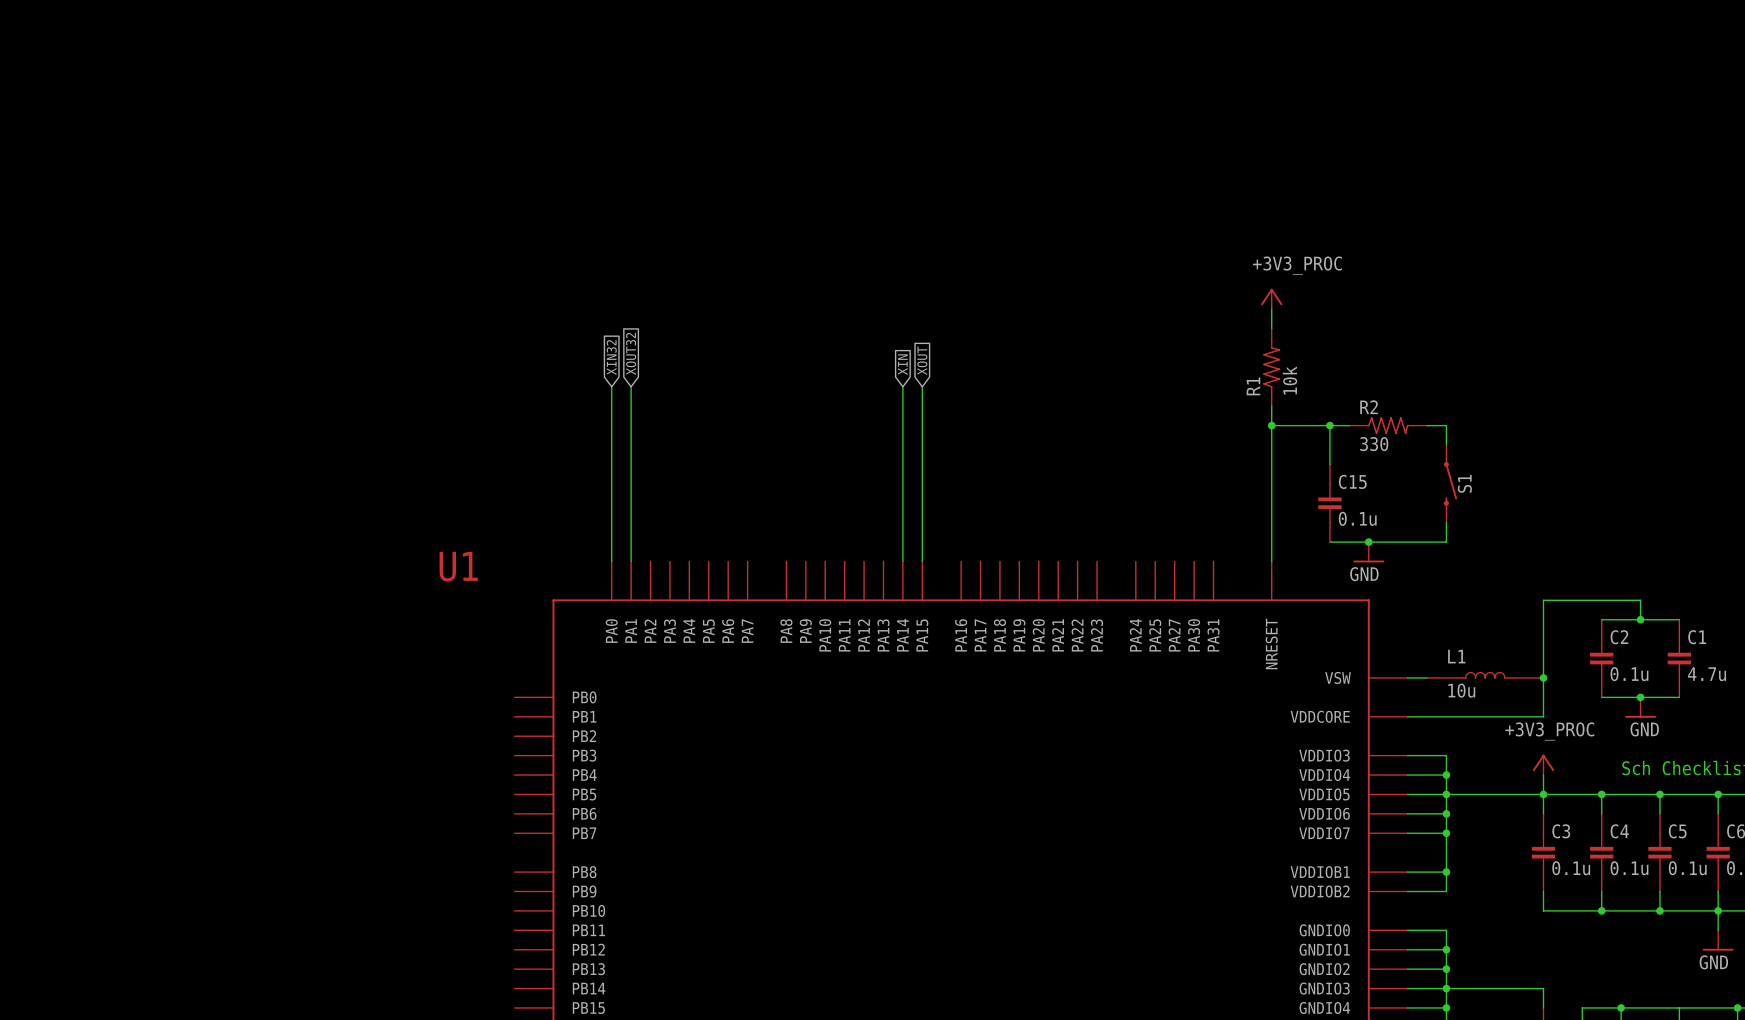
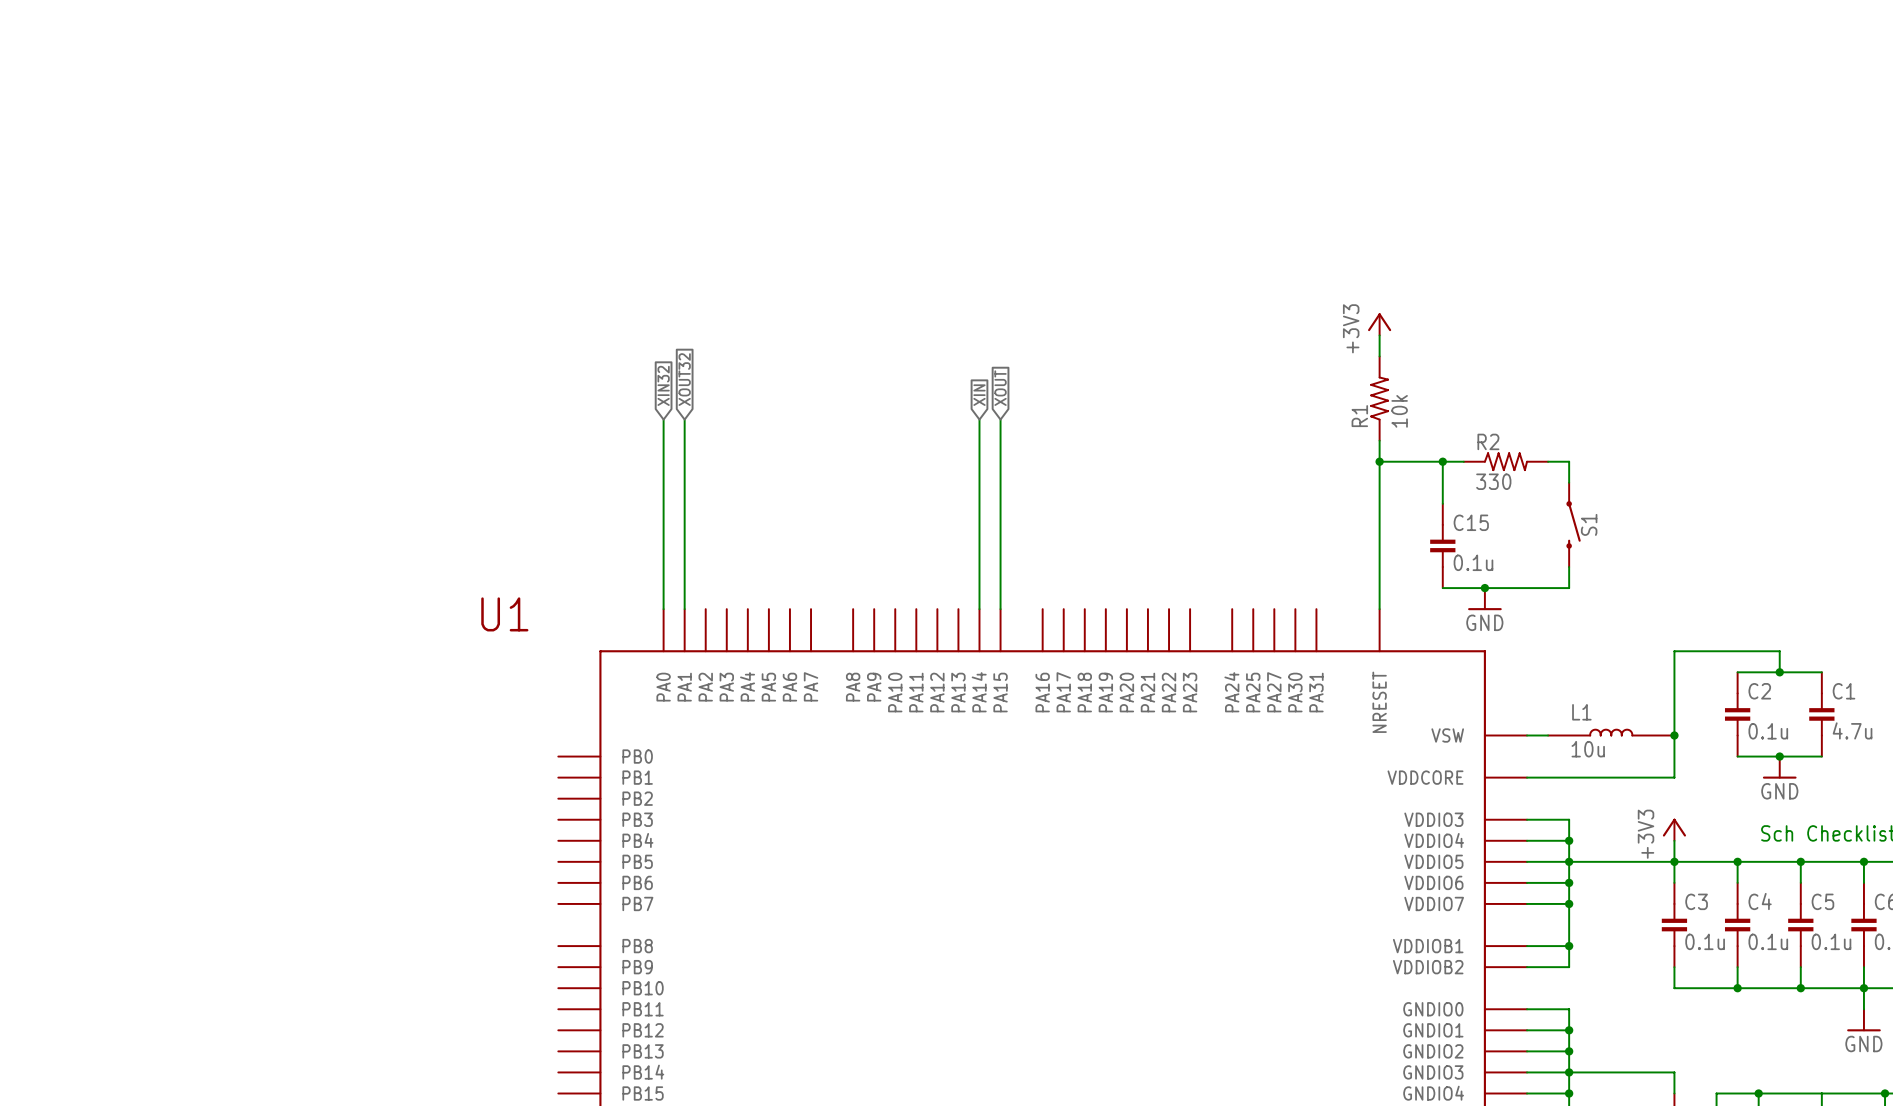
label: +3V3_PROC (1297, 265) -> none
power symbol text: none -> +3V3 (1351, 328)
label: +3V3_PROC (1549, 731) -> none
power symbol text: none -> +3V3 (1646, 834)

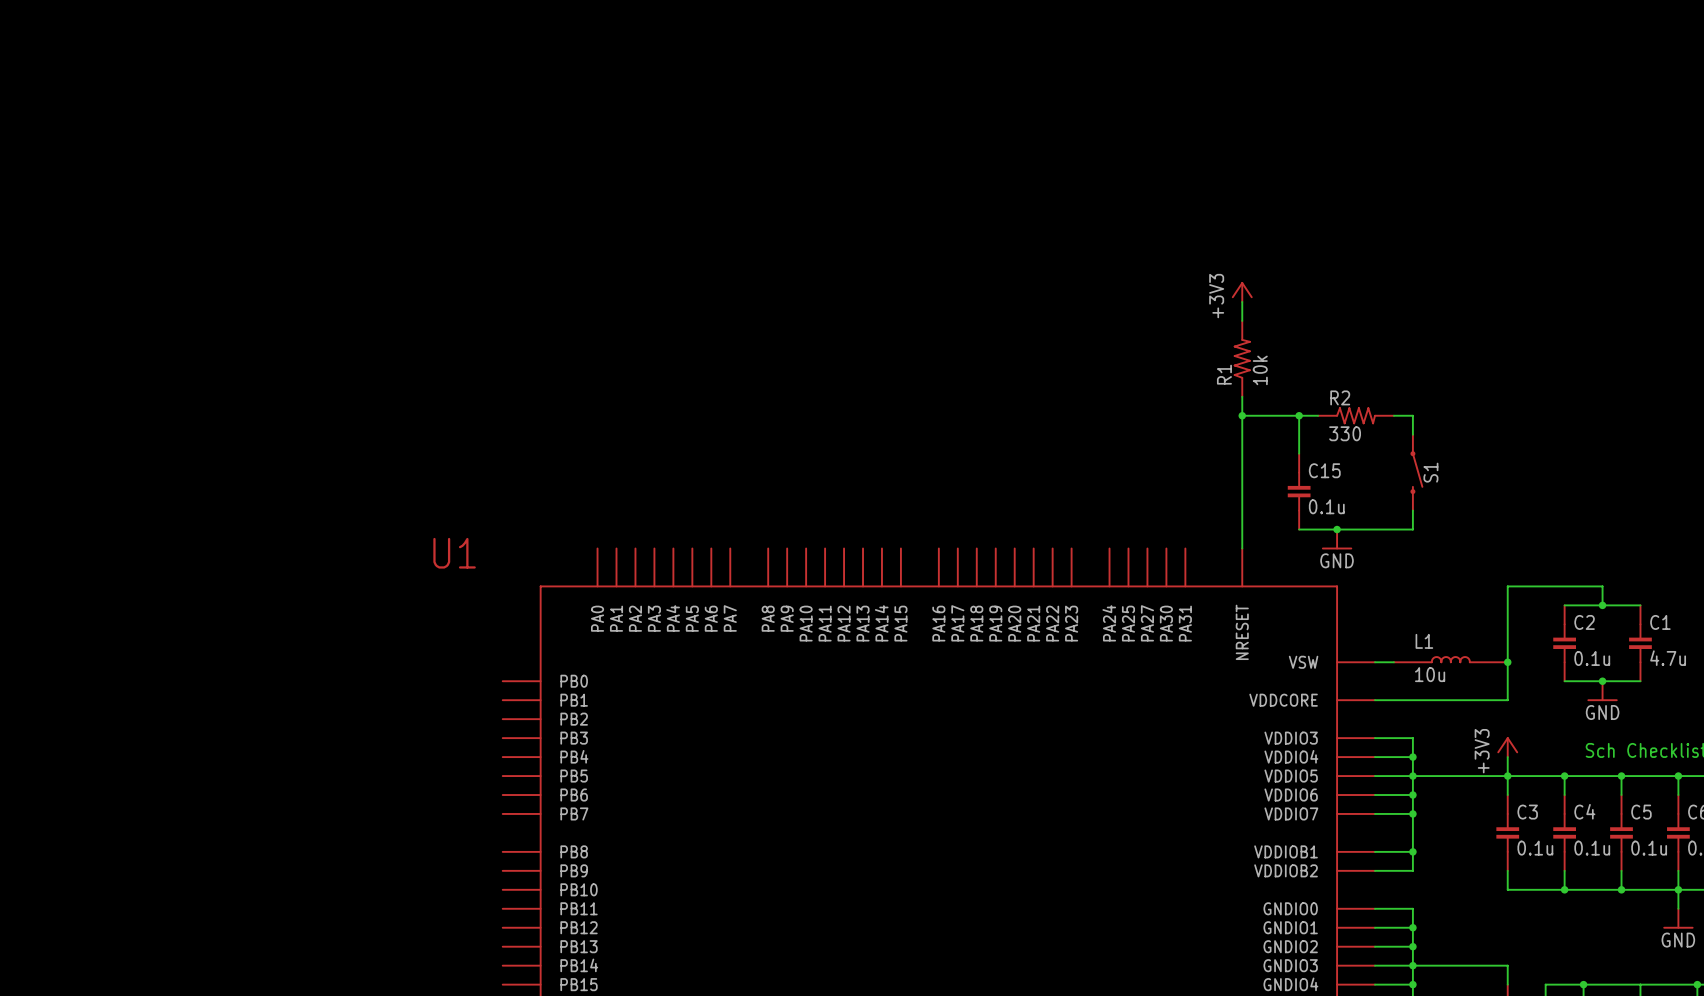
global label: XOUT32 (684, 379) -> none
global label: XIN32 (663, 385) -> none
global label: XOUT (1000, 388) -> none
global label: XIN (979, 395) -> none
wire: (663, 419) (663, 609) -> none
wire: (684, 419) (684, 609) -> none
wire: (979, 419) (979, 609) -> none
wire: (1000, 419) (1000, 609) -> none

